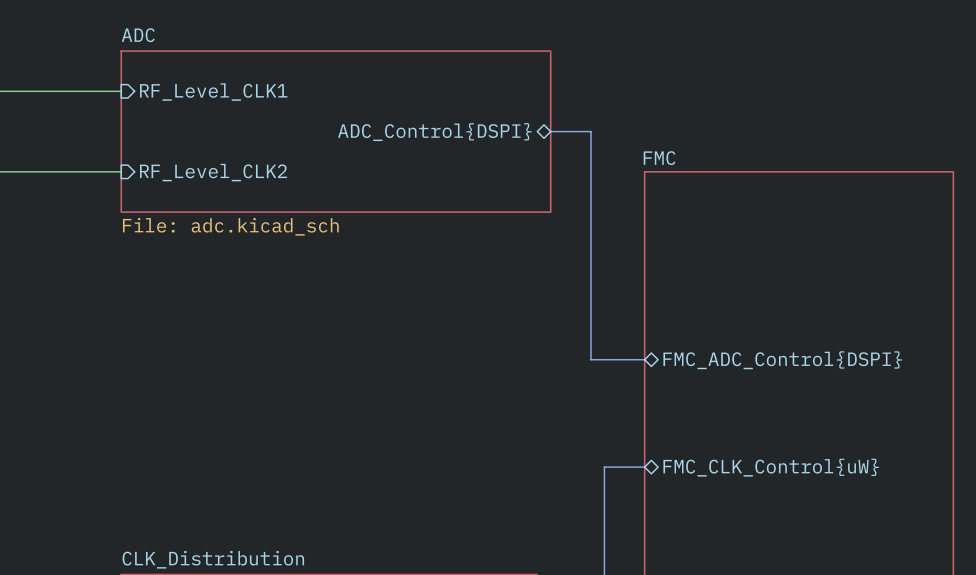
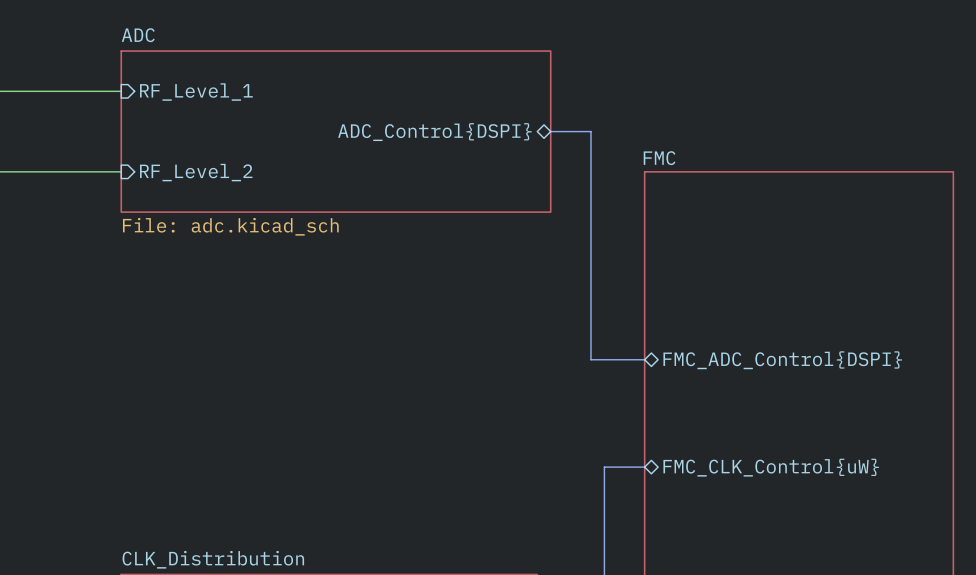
sheet pin: RF_Level_CLK1 (213, 92) -> RF_Level_1 (196, 92)
sheet pin: RF_Level_CLK2 (213, 172) -> RF_Level_2 (196, 172)

